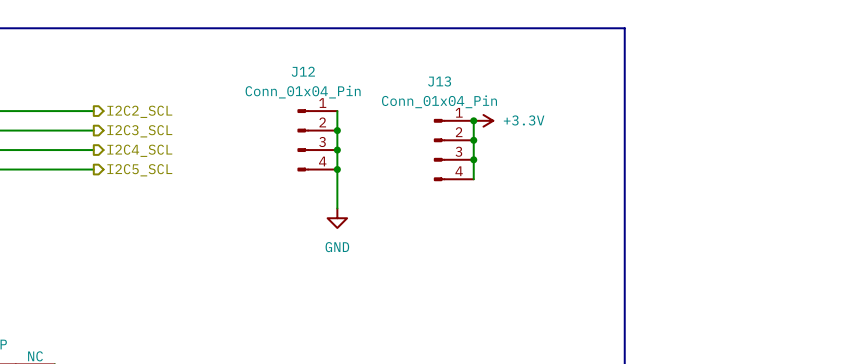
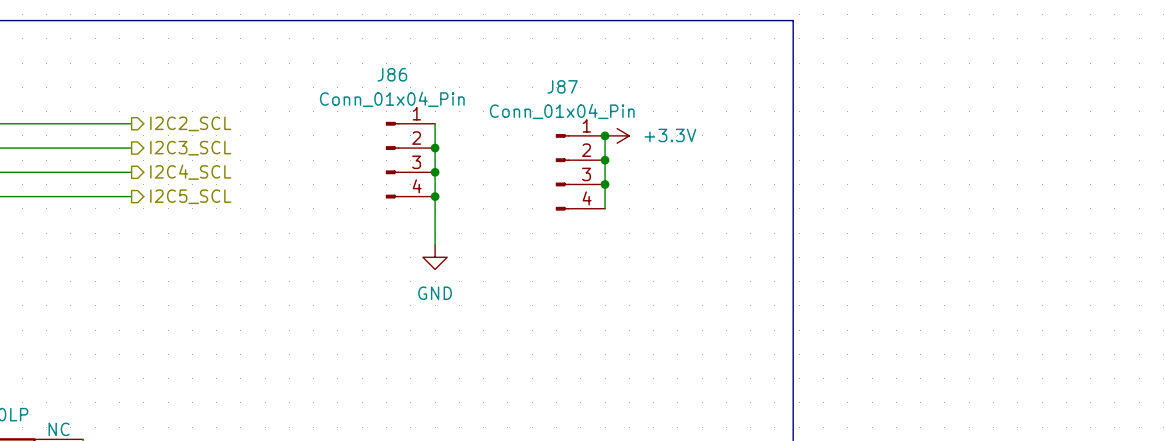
J12 name: J12 (303, 71) -> J86 (392, 74)
J13 name: J13 (439, 81) -> J87 (562, 86)

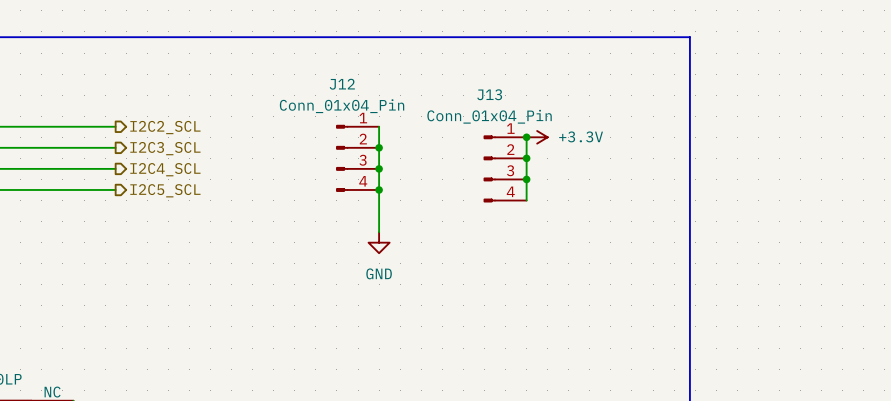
J86 name: J86 (392, 74) -> J12 (342, 84)
J87 name: J87 (562, 86) -> J13 (489, 94)

